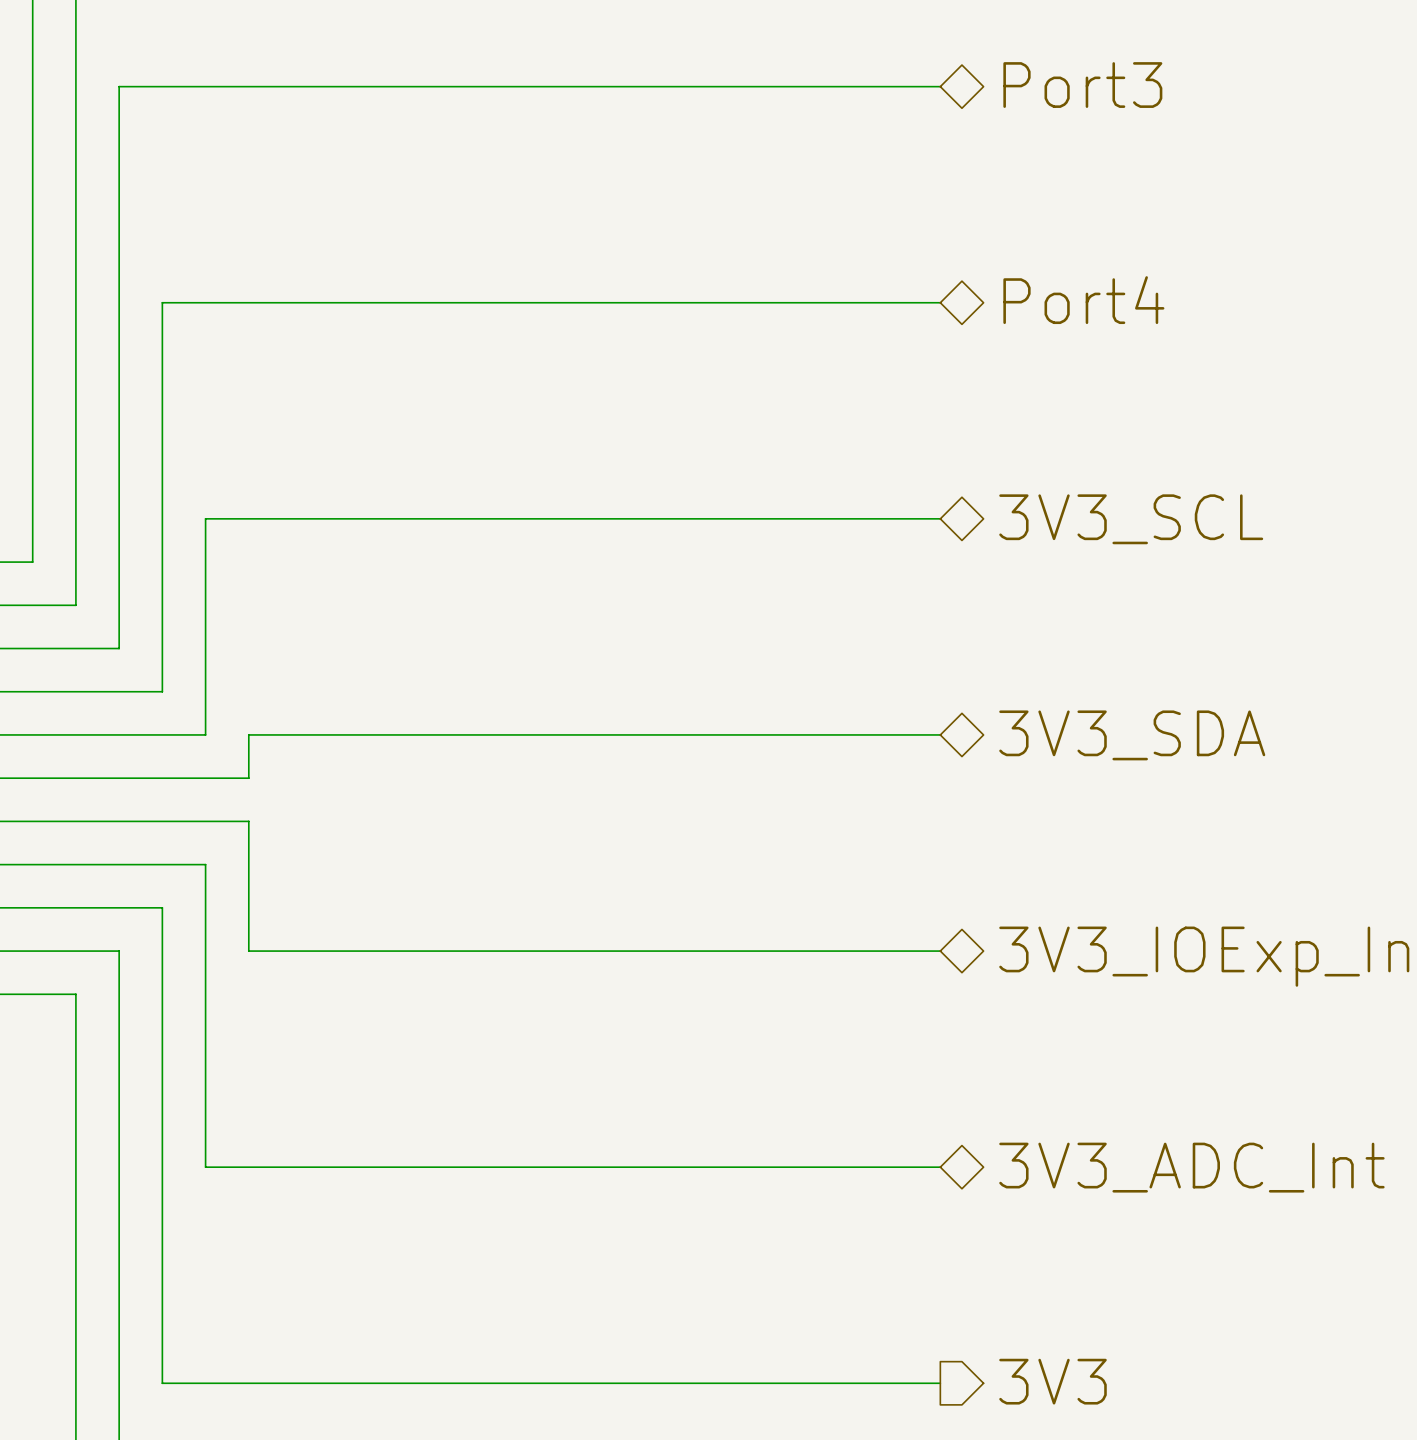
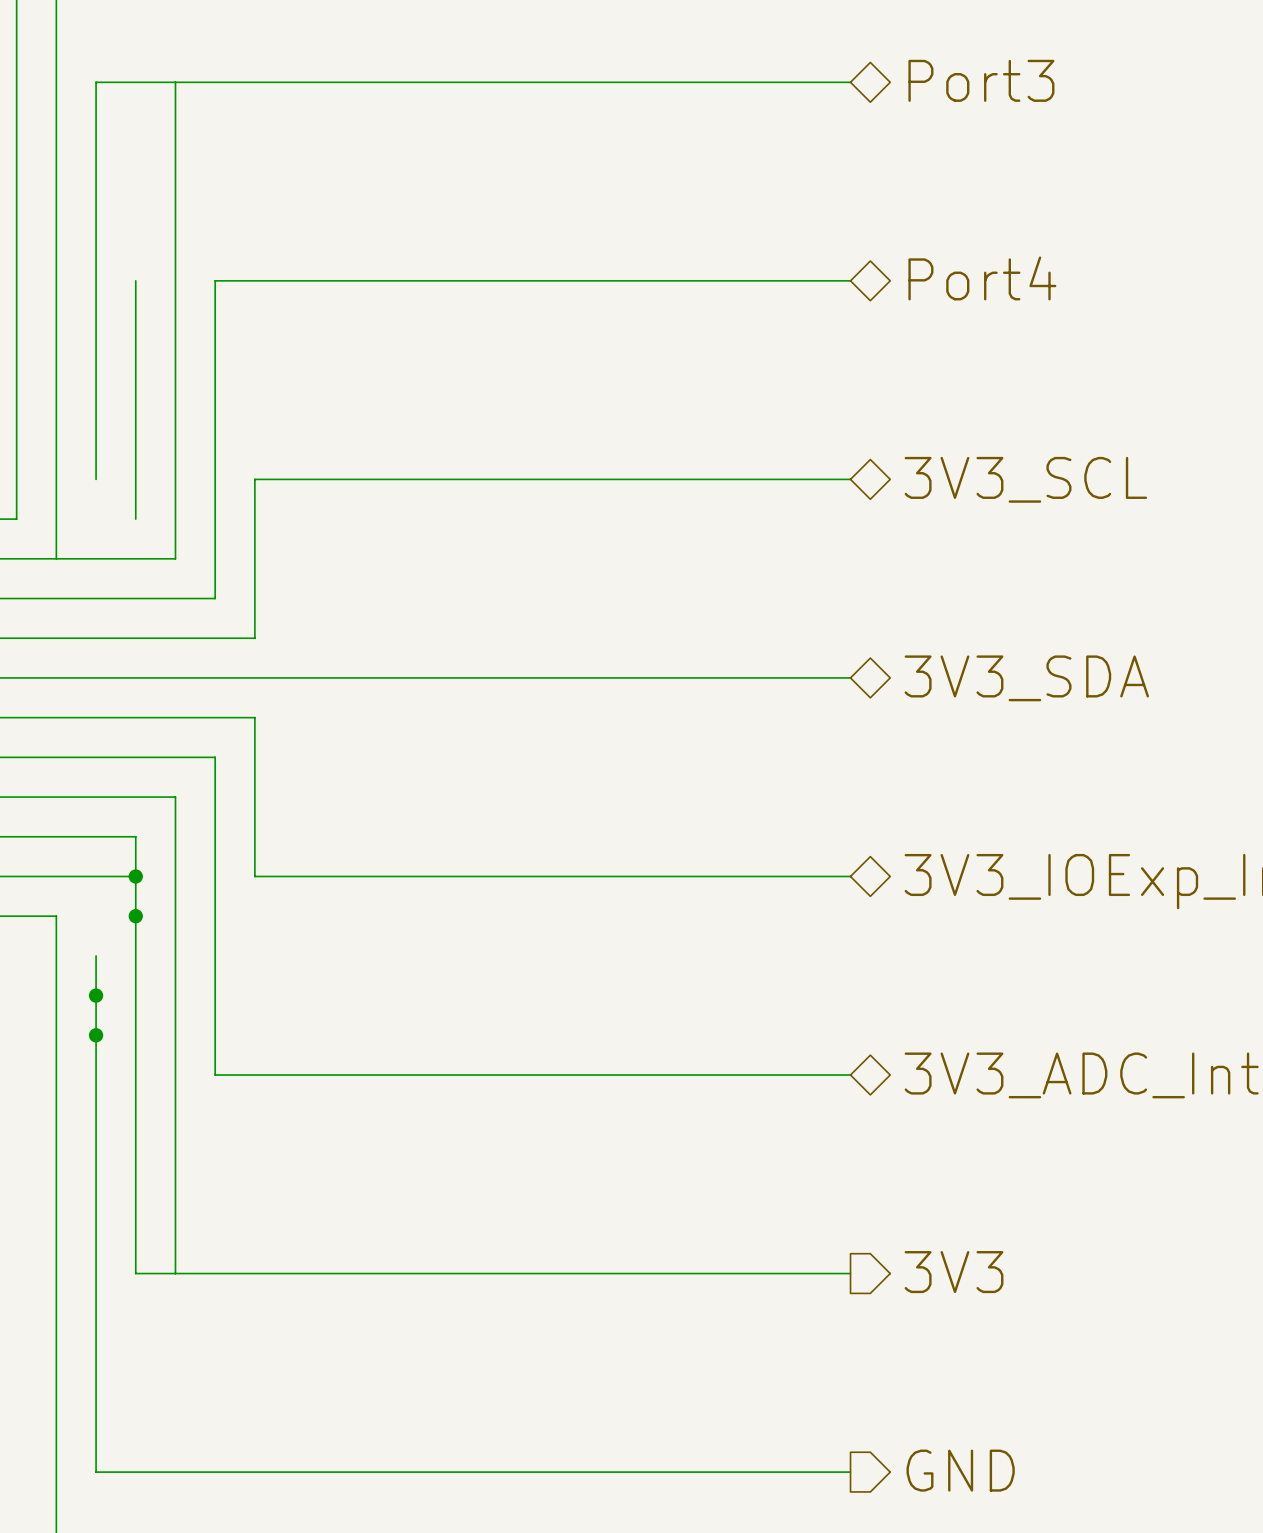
wire: (162, 302) (248, 302) -> none
wire: (119, 518) (119, 648) -> (215, 280) (215, 598) (96, 598)
wire: (205, 518) (292, 518) -> (175, 479) (175, 82)
wire: (162, 562) (162, 691) -> (254, 479) (254, 638) (135, 638)
wire: (205, 605) (205, 734) -> (175, 558) (56, 558)
wire: (248, 734) (248, 778) -> (215, 677) (175, 677)
wire: (119, 951) (119, 1037) -> (96, 876) (135, 876)
junction: none -> (135, 876)
wire: (248, 951) (292, 951) -> (215, 717) (254, 717) (254, 876)
junction: none -> (135, 916)
junction: none -> (96, 995)
junction: none -> (96, 1035)
wire: (205, 1167) (248, 1167) -> (215, 876) (215, 1075)
wire: none -> (175, 1075) (175, 1273)

